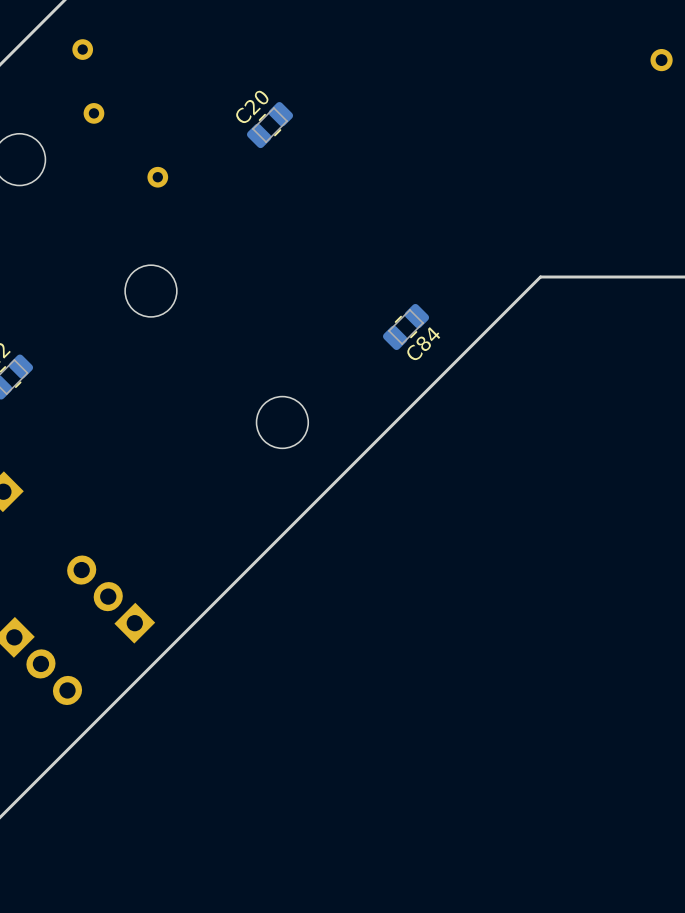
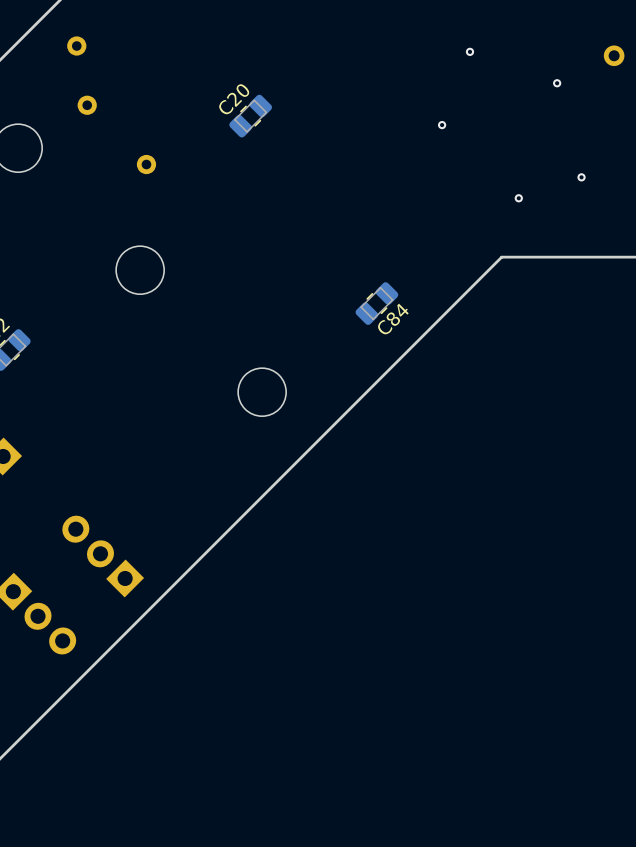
via: none -> (469, 51)
via: none -> (557, 83)
via: none -> (442, 125)
via: none -> (581, 177)
via: none -> (518, 198)

